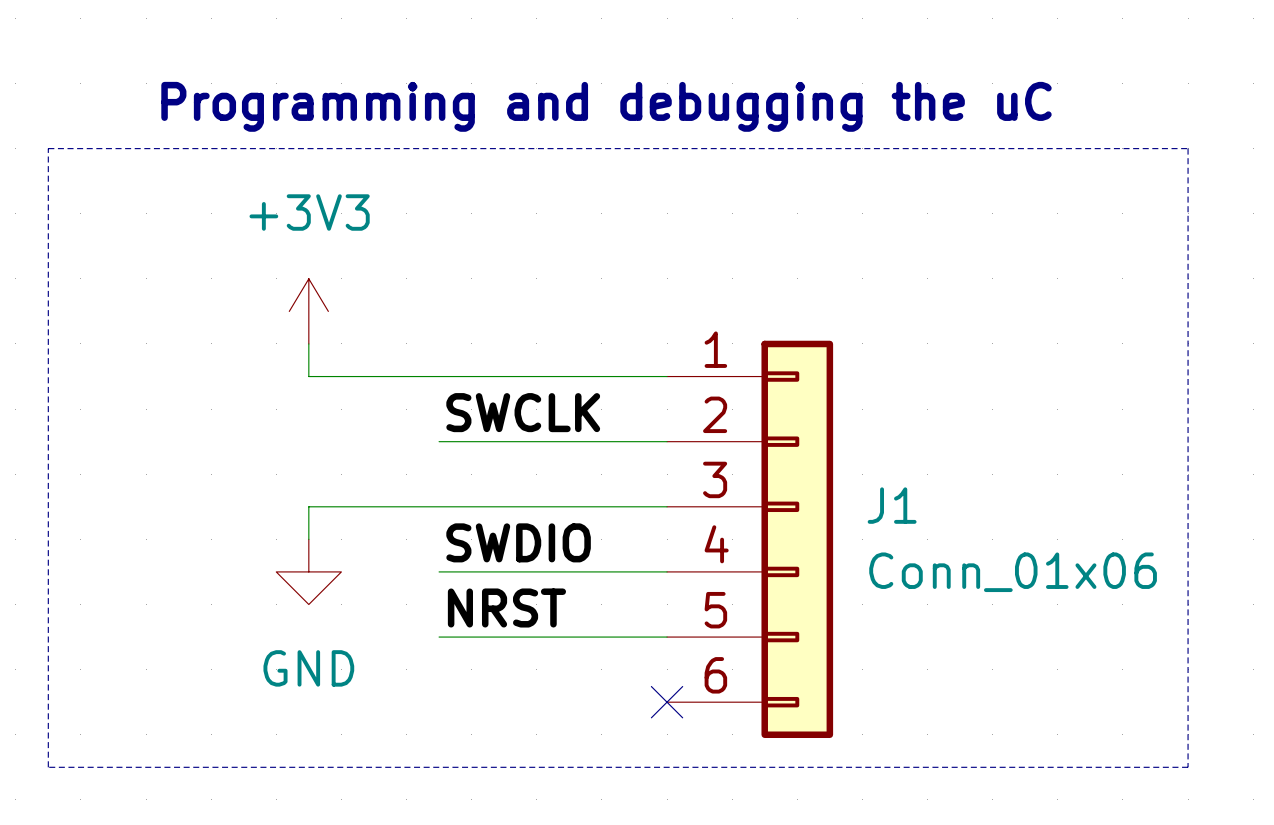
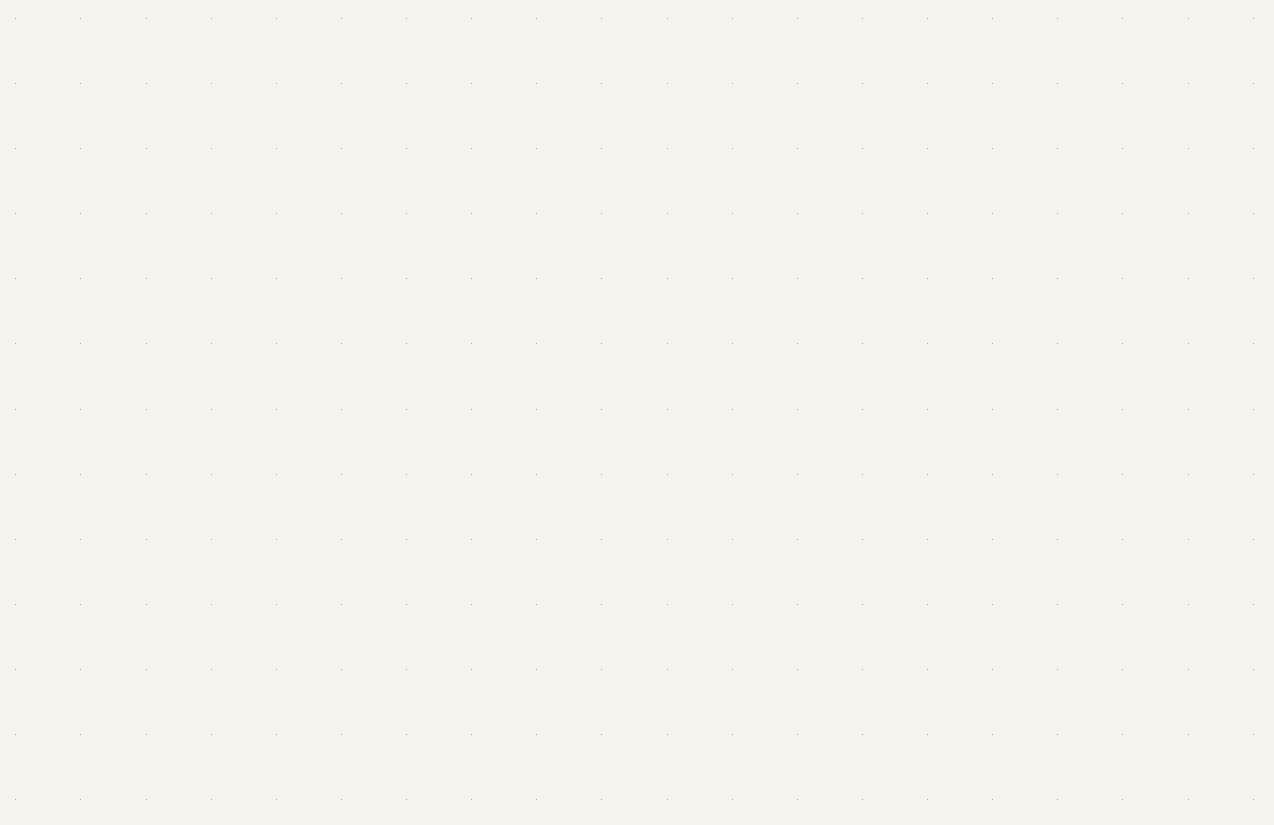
text: Programming and debugging the uC (606, 106) -> none
line: (48, 148) (1188, 148) (1188, 767) (48, 767) (48, 148) -> none
power symbol: +3V3 (308, 311) -> none
wire: (308, 343) (308, 376) (667, 376) -> none
label: SWCLK (523, 412) -> none
wire: (439, 441) (667, 441) -> none
wire: (667, 506) (308, 506) (308, 539) -> none
J1: Conn_01x06 (750, 539) -> none
label: SWDIO (518, 542) -> none
power symbol: GND (308, 571) -> none
wire: (439, 571) (667, 571) -> none
label: NRST (506, 608) -> none
wire: (439, 637) (667, 637) -> none
no-connect mark: (667, 702) -> none

